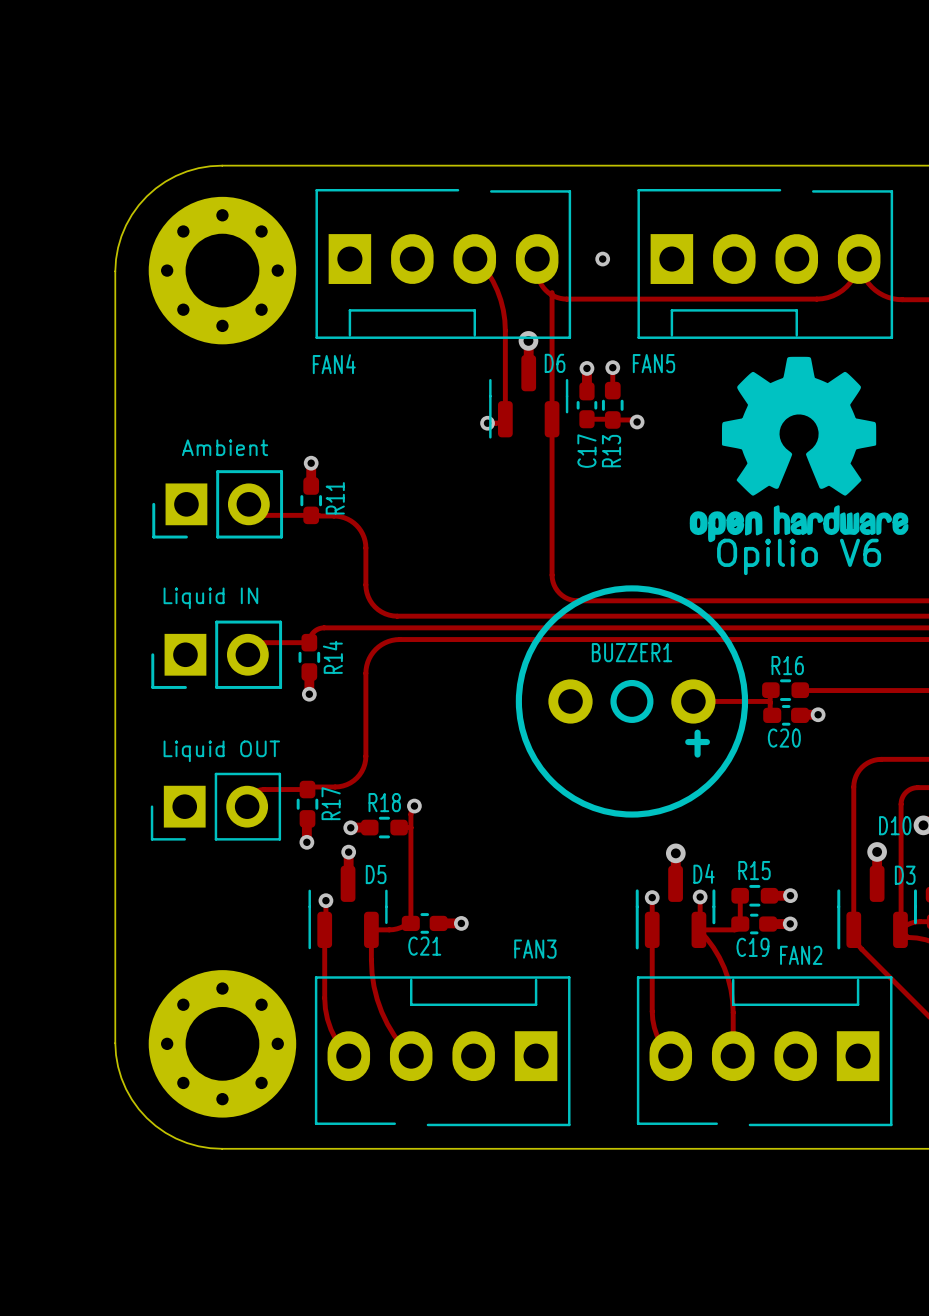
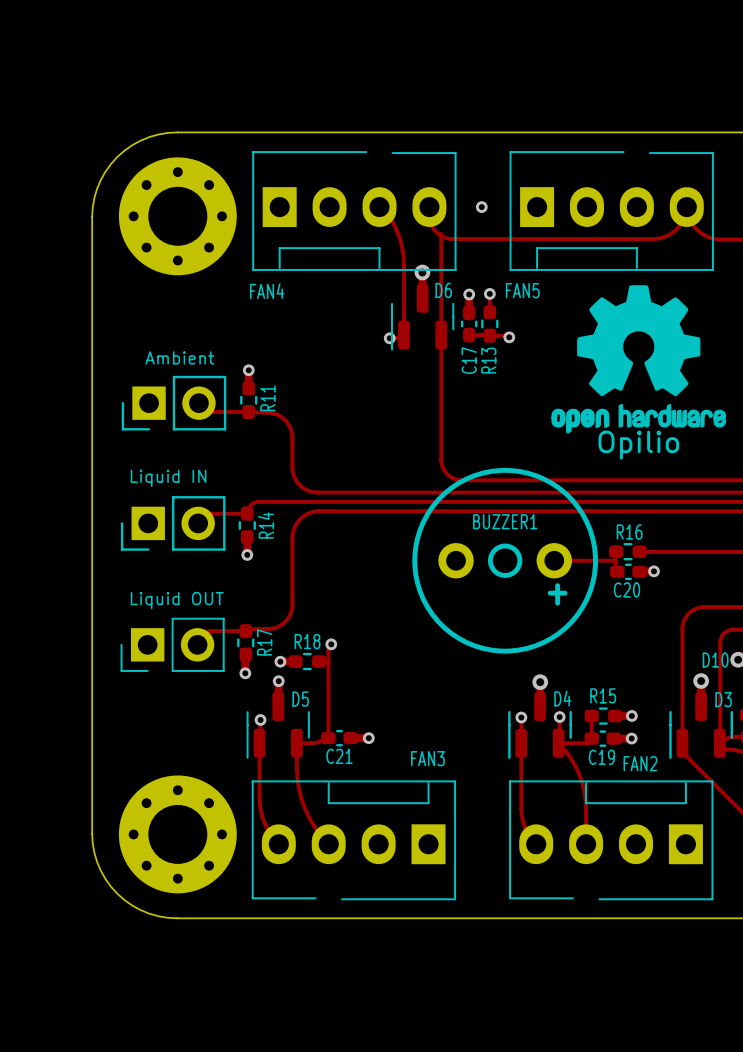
text: Opilio V6 (799, 556) -> Opilio (638, 445)

